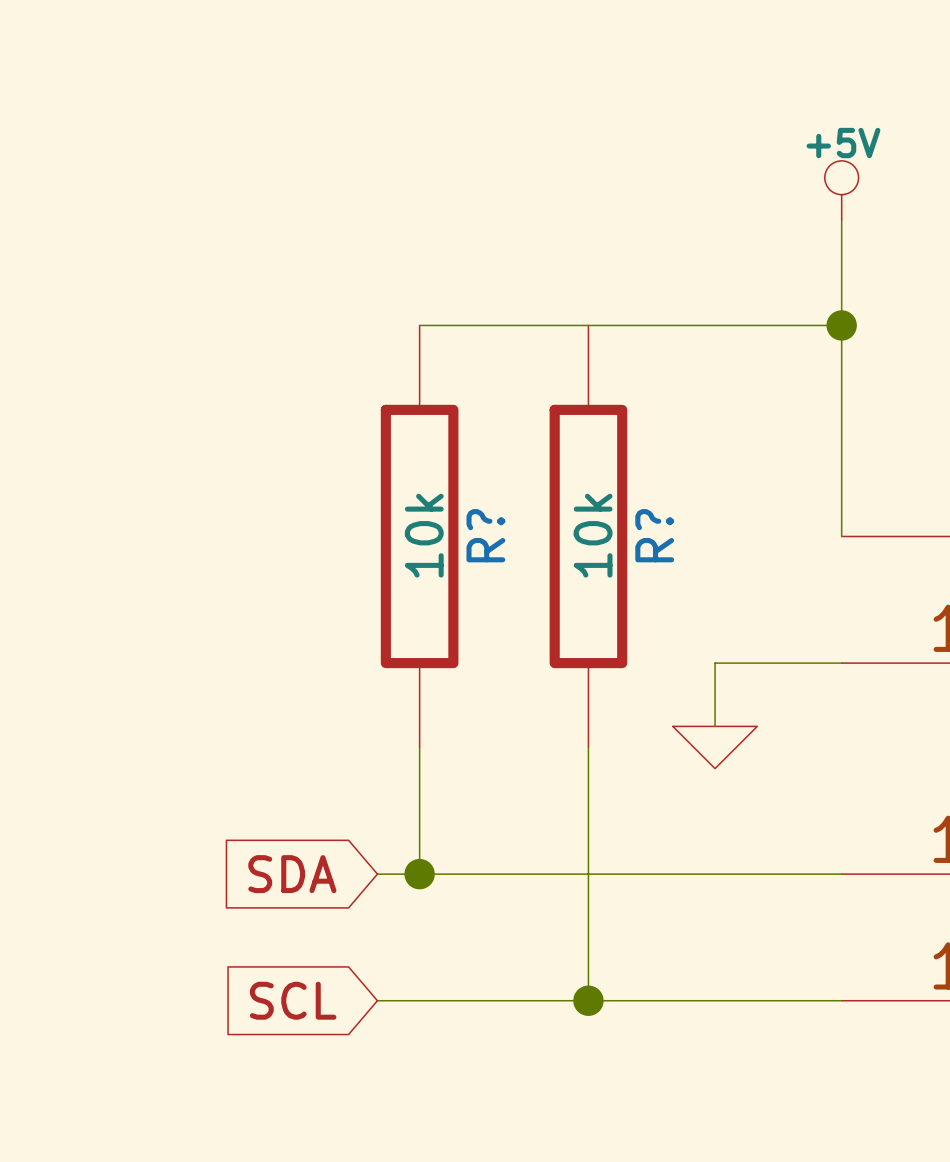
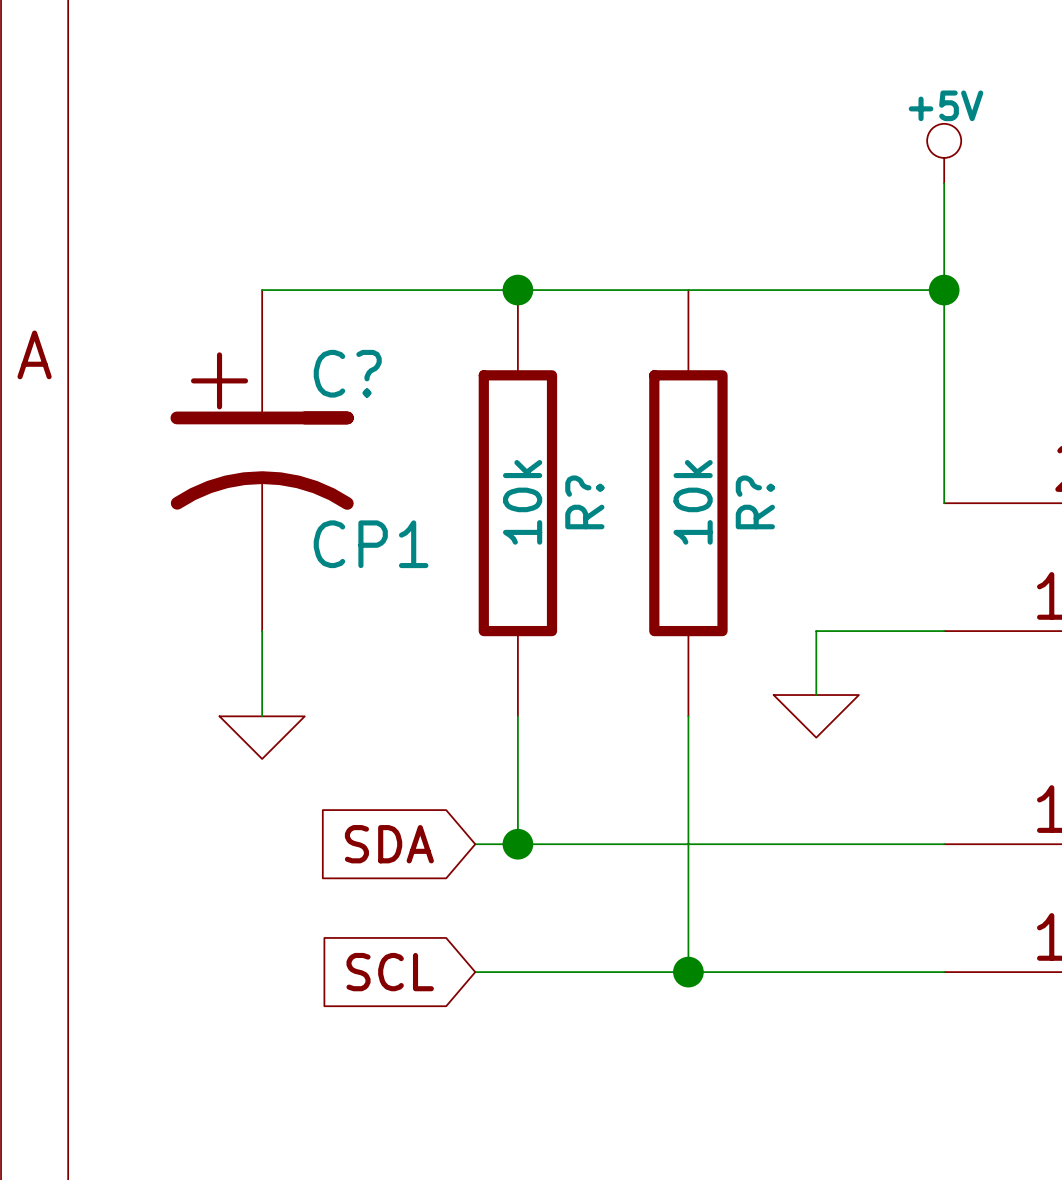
wire: none -> (262, 290) (517, 290)
junction: none -> (517, 290)
C?: none -> CP1 (262, 460)
wire: none -> (262, 631) (262, 716)
power symbol: none -> (262, 737)

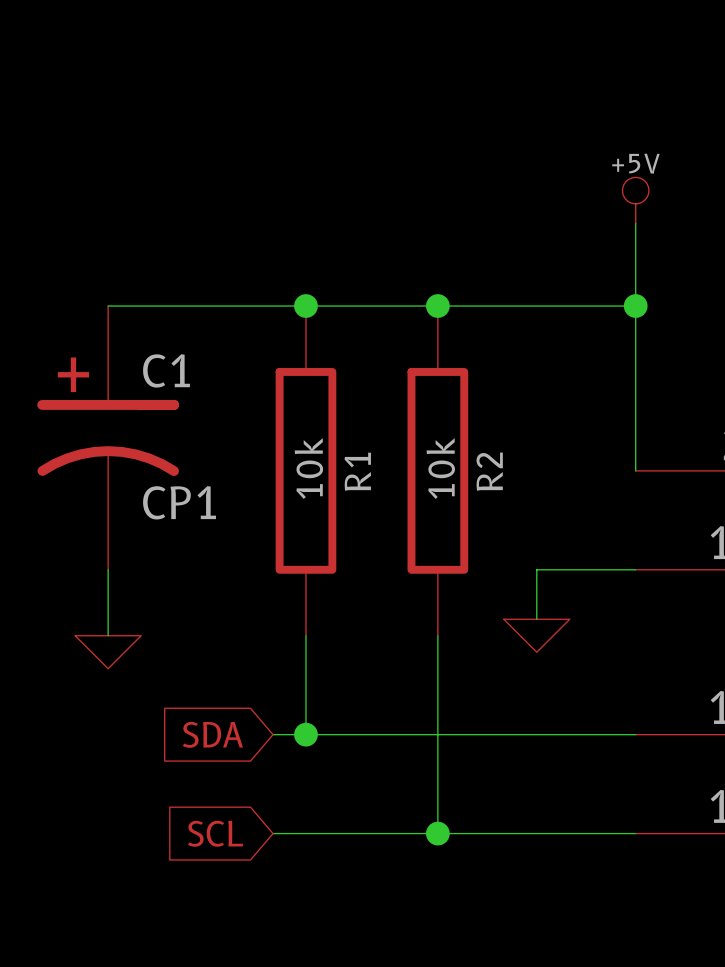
junction: none -> (437, 306)
C? name: C? (347, 373) -> C1 (166, 370)
R? name: R? (584, 502) -> R1 (357, 471)
R? name: R? (755, 502) -> R2 (489, 471)

